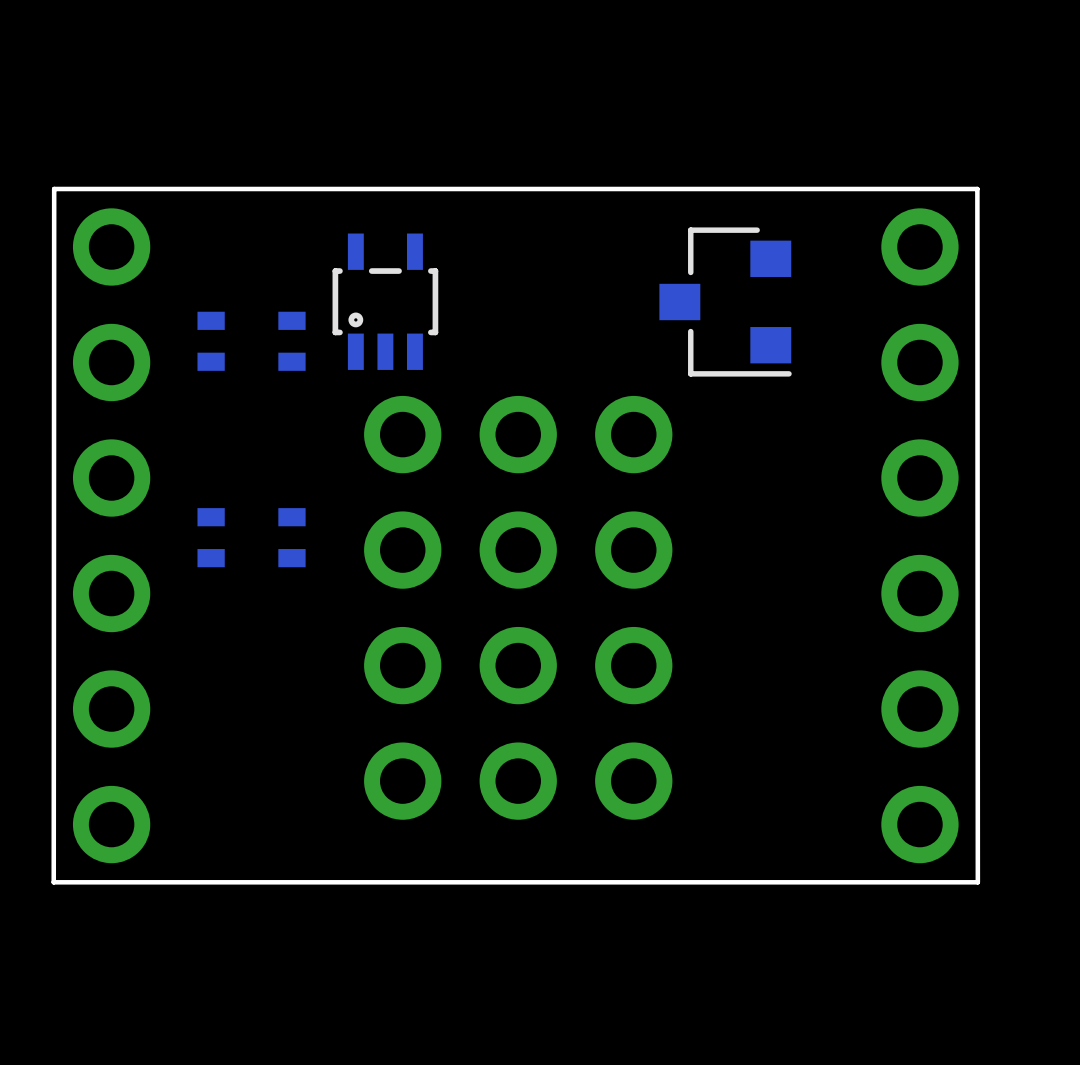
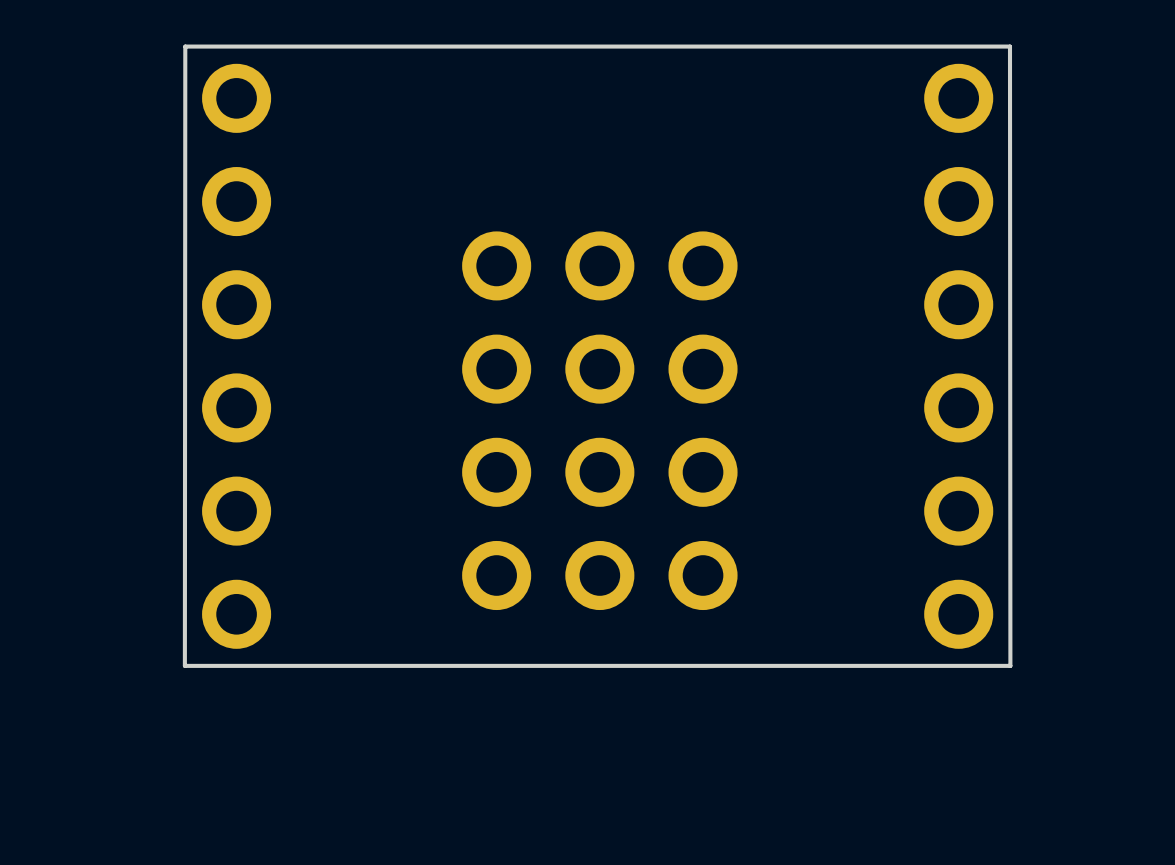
part: (385, 301) -> none
part: (725, 302) -> none
part: (211, 341) -> none
part: (291, 341) -> none
part: (211, 537) -> none
part: (291, 537) -> none

